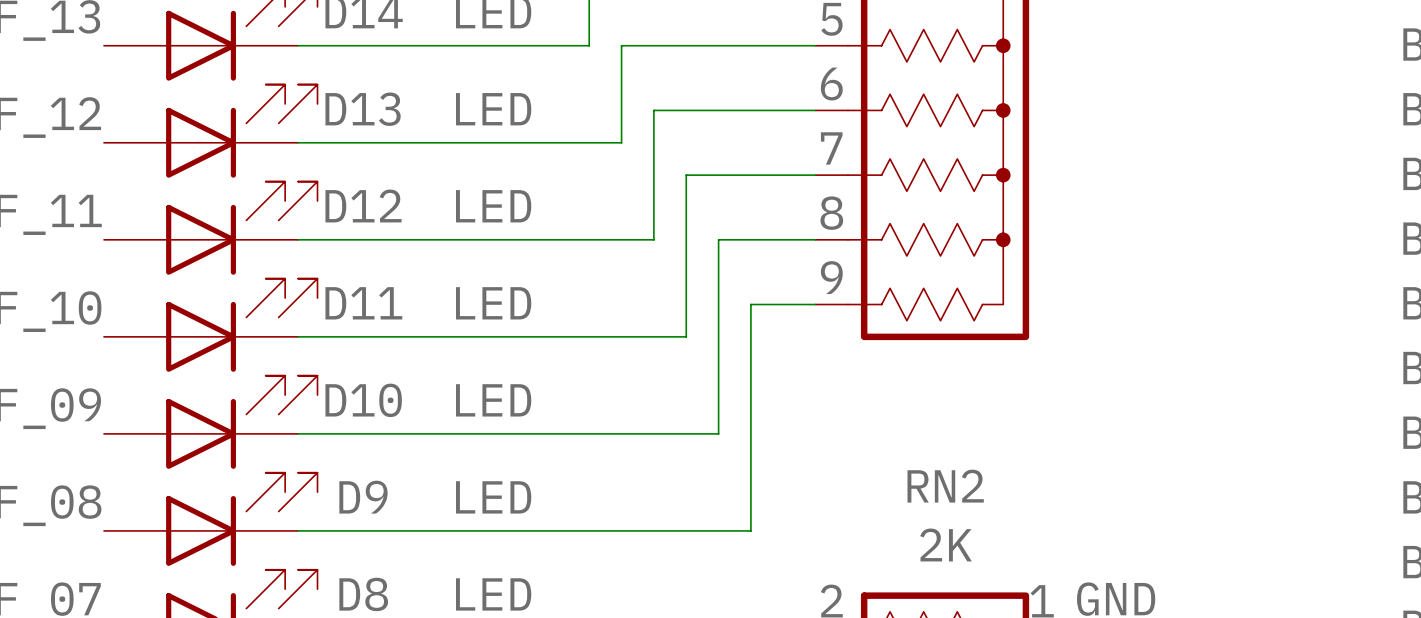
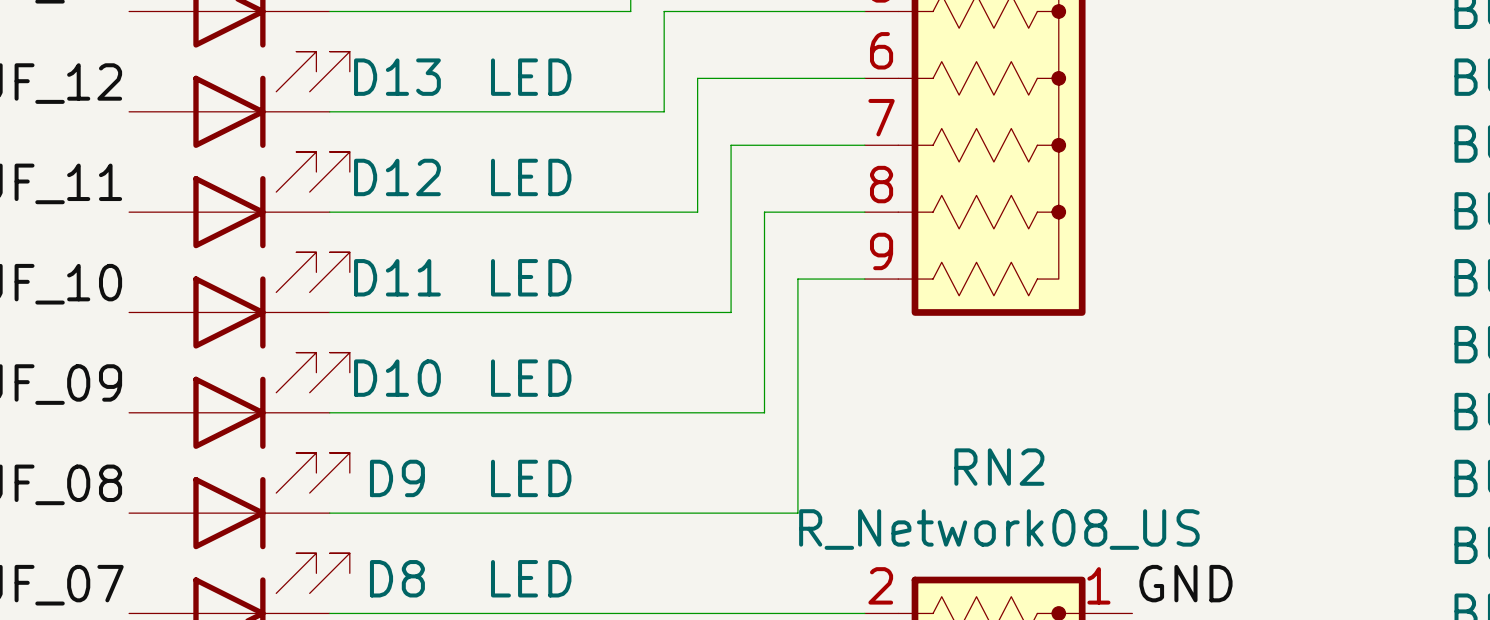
RN2 value: 2K (946, 544) -> R_Network08_US (999, 529)

